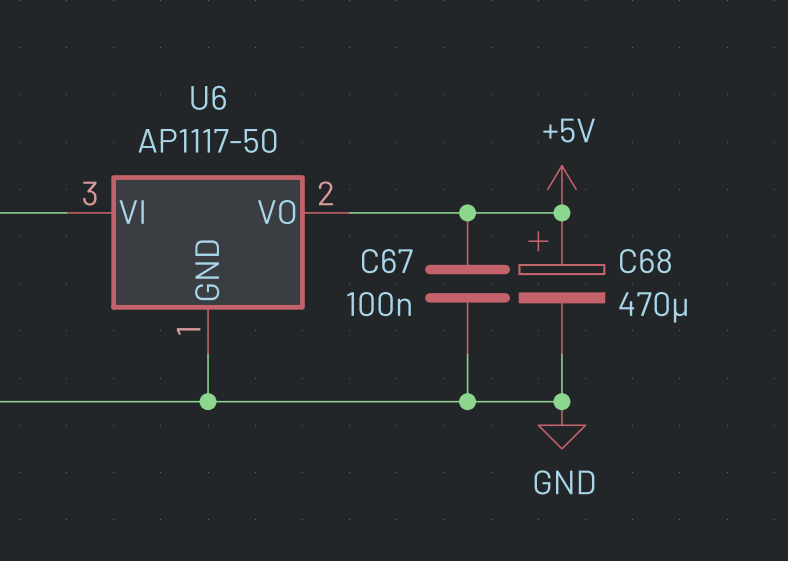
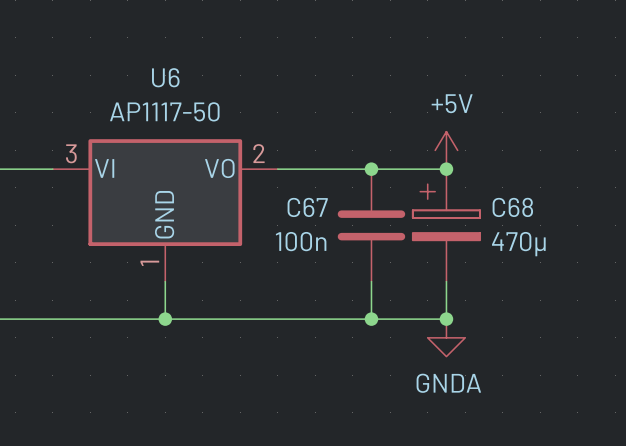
power symbol: GND (561, 425) -> GNDA (446, 337)

